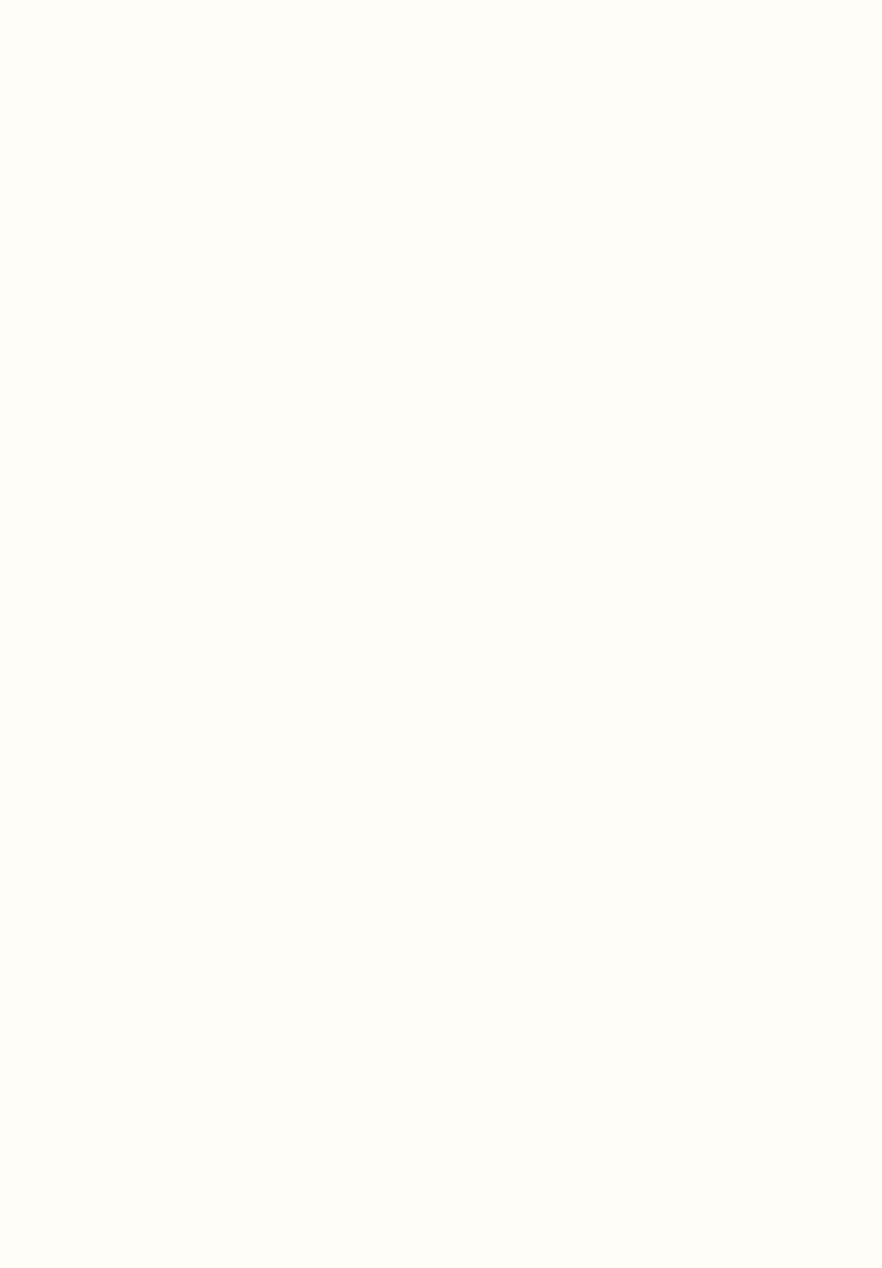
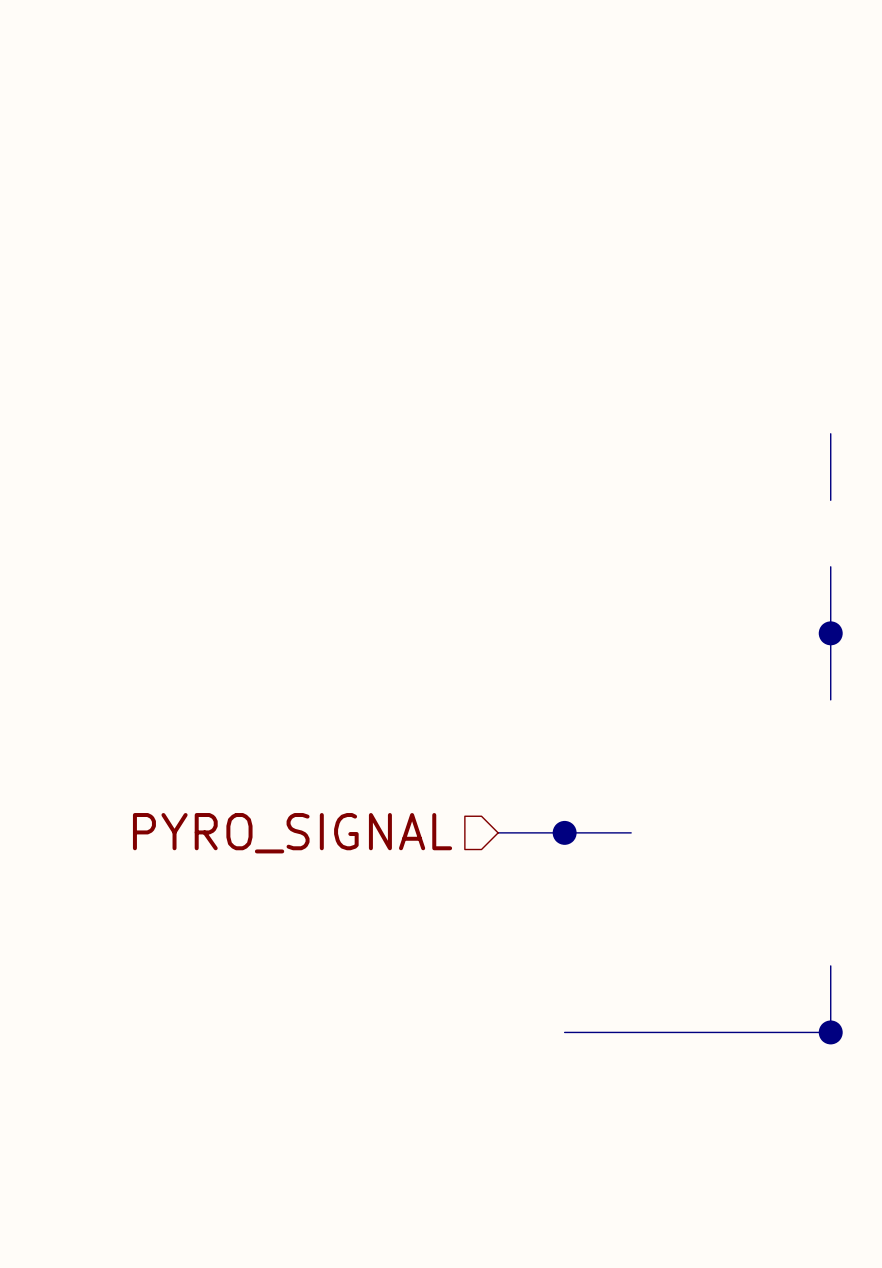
wire: none -> (830, 433) (830, 500)
wire: none -> (830, 566) (830, 699)
junction: none -> (830, 633)
wire: none -> (498, 832) (631, 832)
junction: none -> (564, 832)
hierarchical label: none -> PYRO_SIGNAL (292, 833)
wire: none -> (830, 965) (830, 1032) (564, 1032)
junction: none -> (830, 1032)

